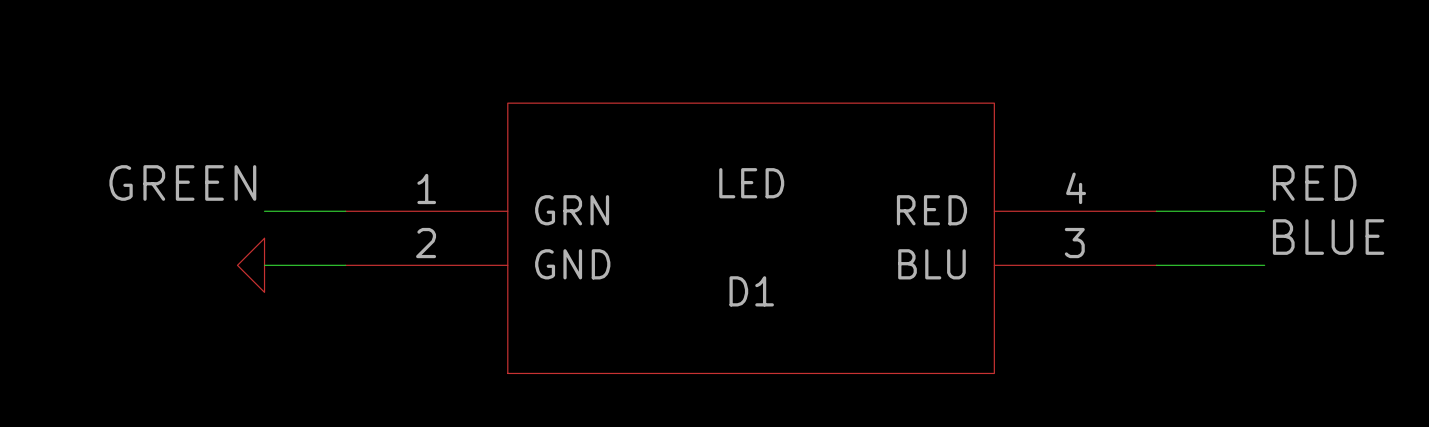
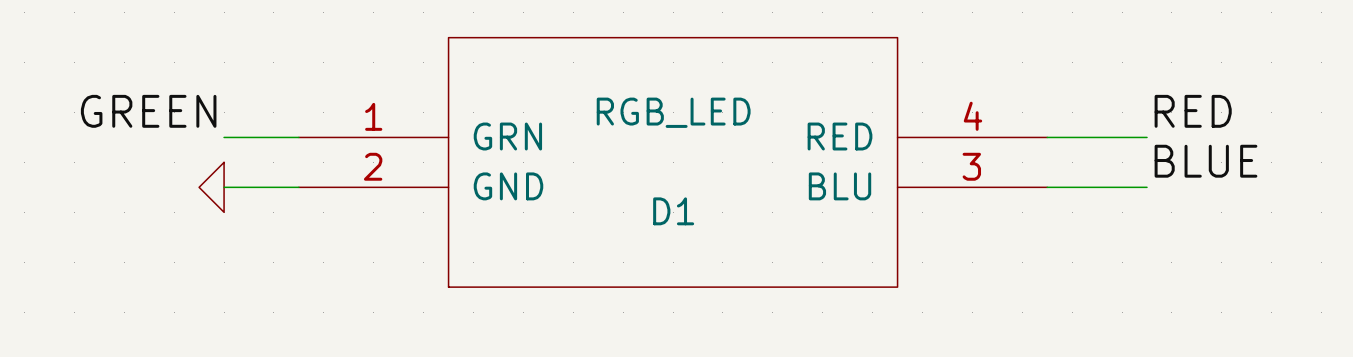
D1 value: LED (751, 183) -> RGB_LED (673, 112)

